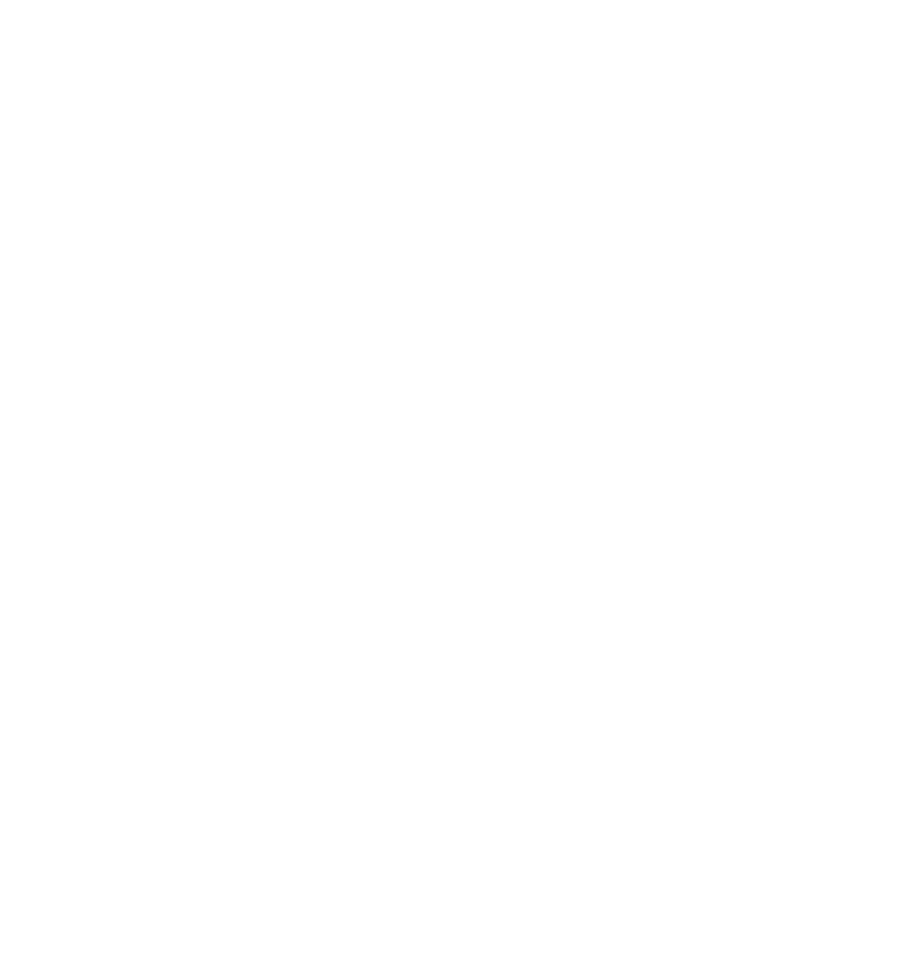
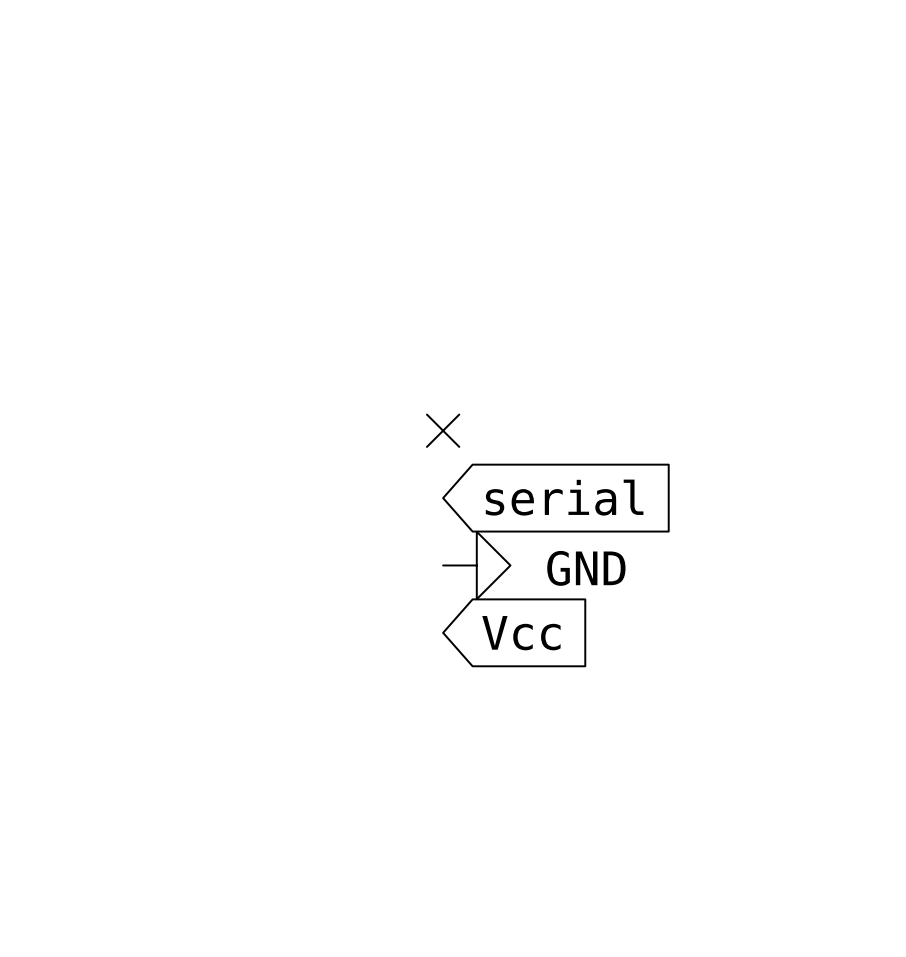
no-connect mark: none -> (443, 430)
global label: none -> serial (564, 497)
power symbol: none -> GND (476, 565)
global label: none -> Vcc (521, 633)

